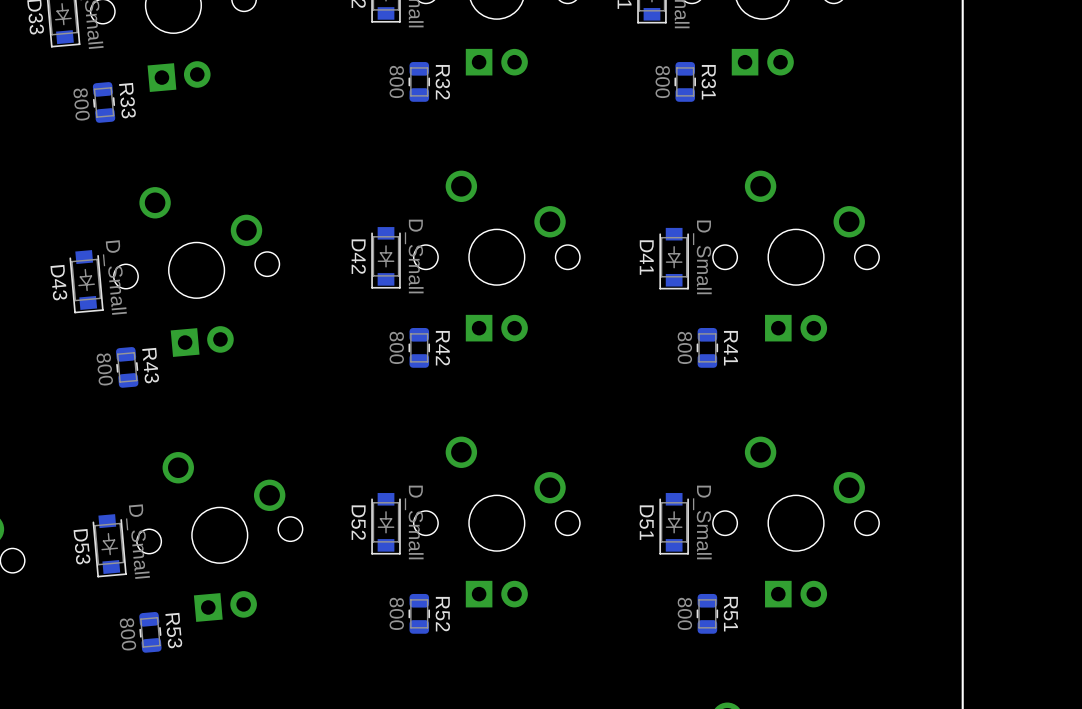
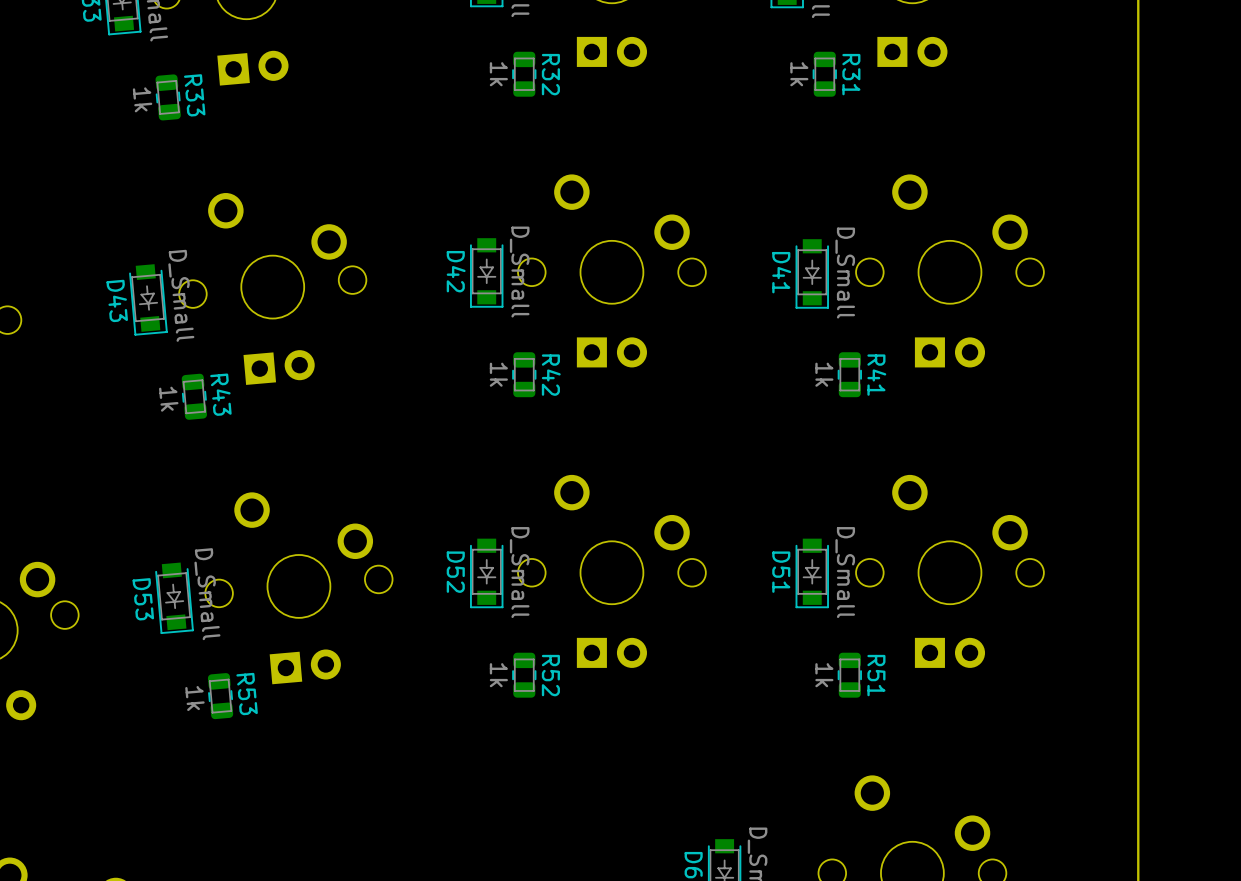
R32 value: 800 (396, 81) -> 1k (498, 74)
R31 value: 800 (662, 81) -> 1k (799, 74)
R33 value: 800 (81, 104) -> 1k (142, 99)
R42 value: 800 (396, 347) -> 1k (498, 374)
R41 value: 800 (684, 347) -> 1k (824, 374)
R43 value: 800 (104, 369) -> 1k (168, 399)
R52 value: 800 (396, 613) -> 1k (498, 675)
R51 value: 800 (684, 613) -> 1k (824, 675)
R53 value: 800 (127, 634) -> 1k (194, 698)

